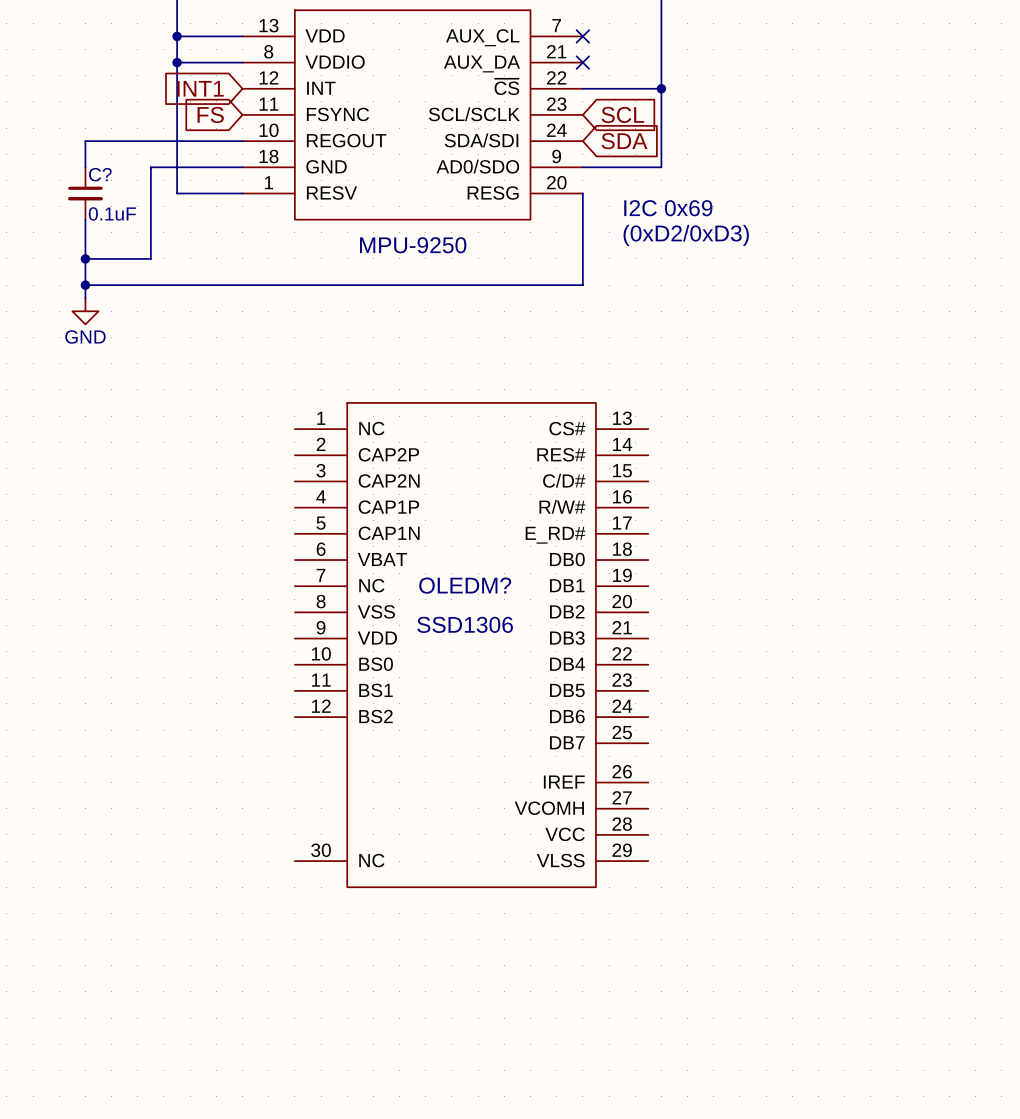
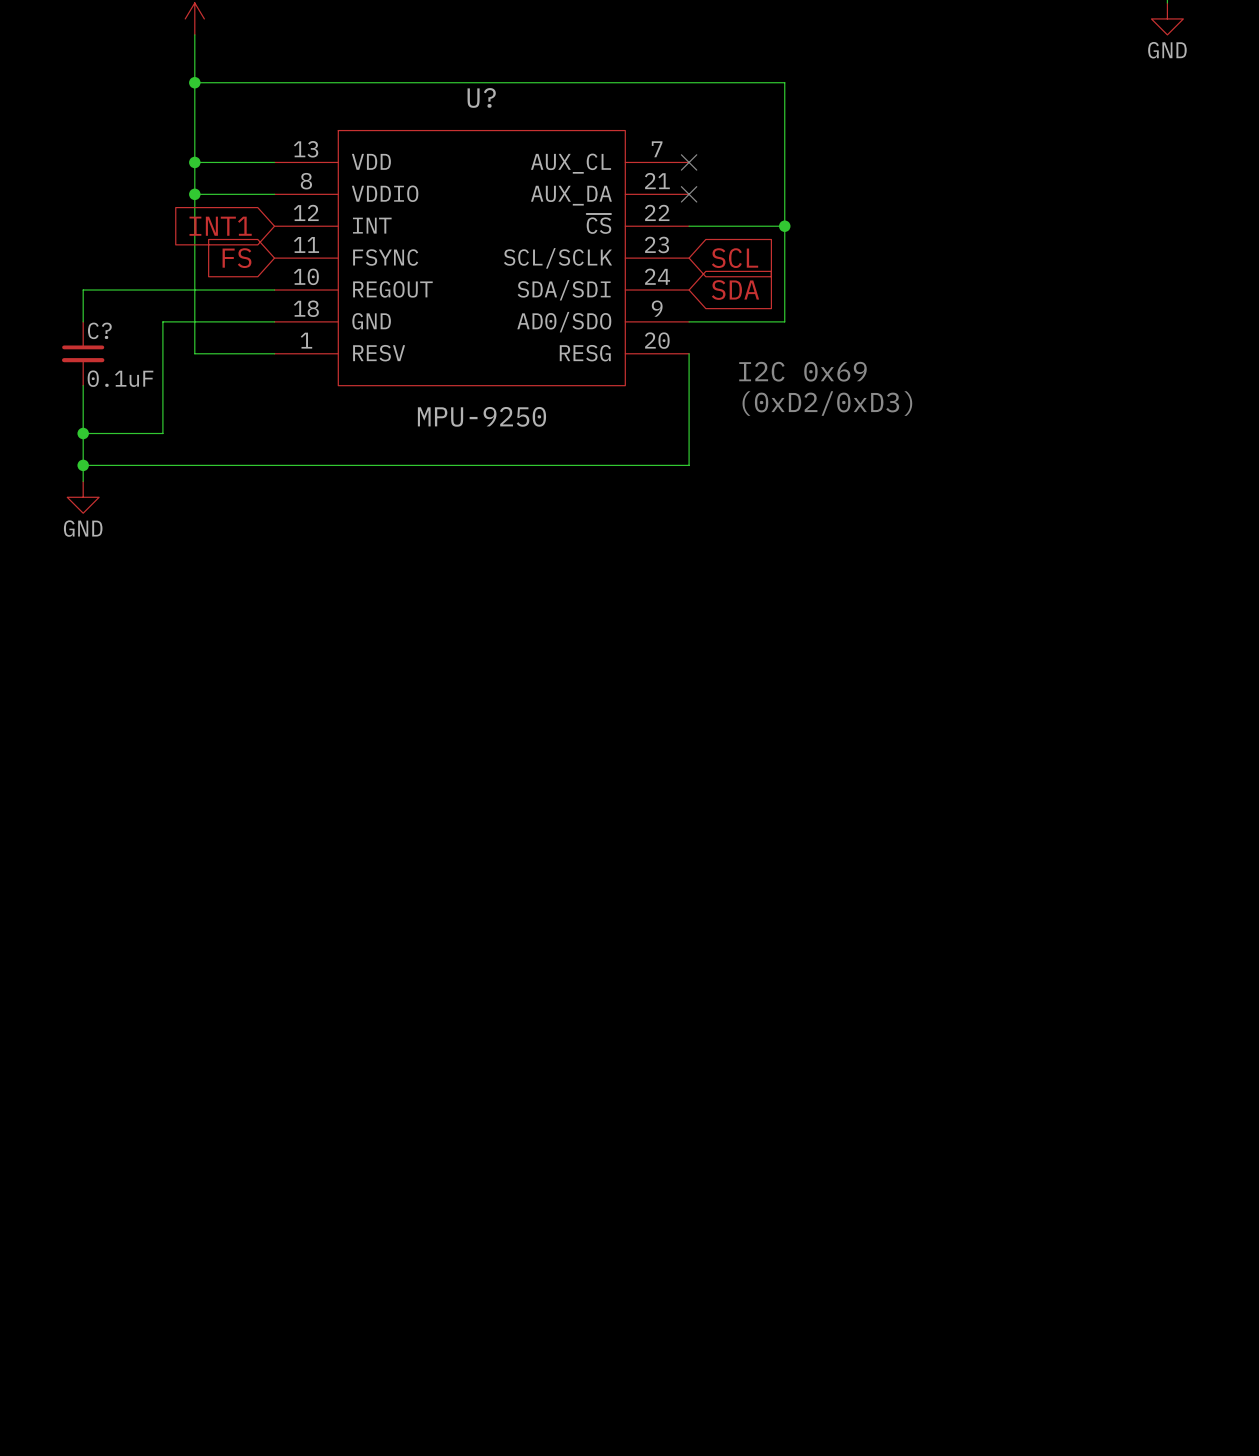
OLEDM?: SSD1306 (471, 645) -> none

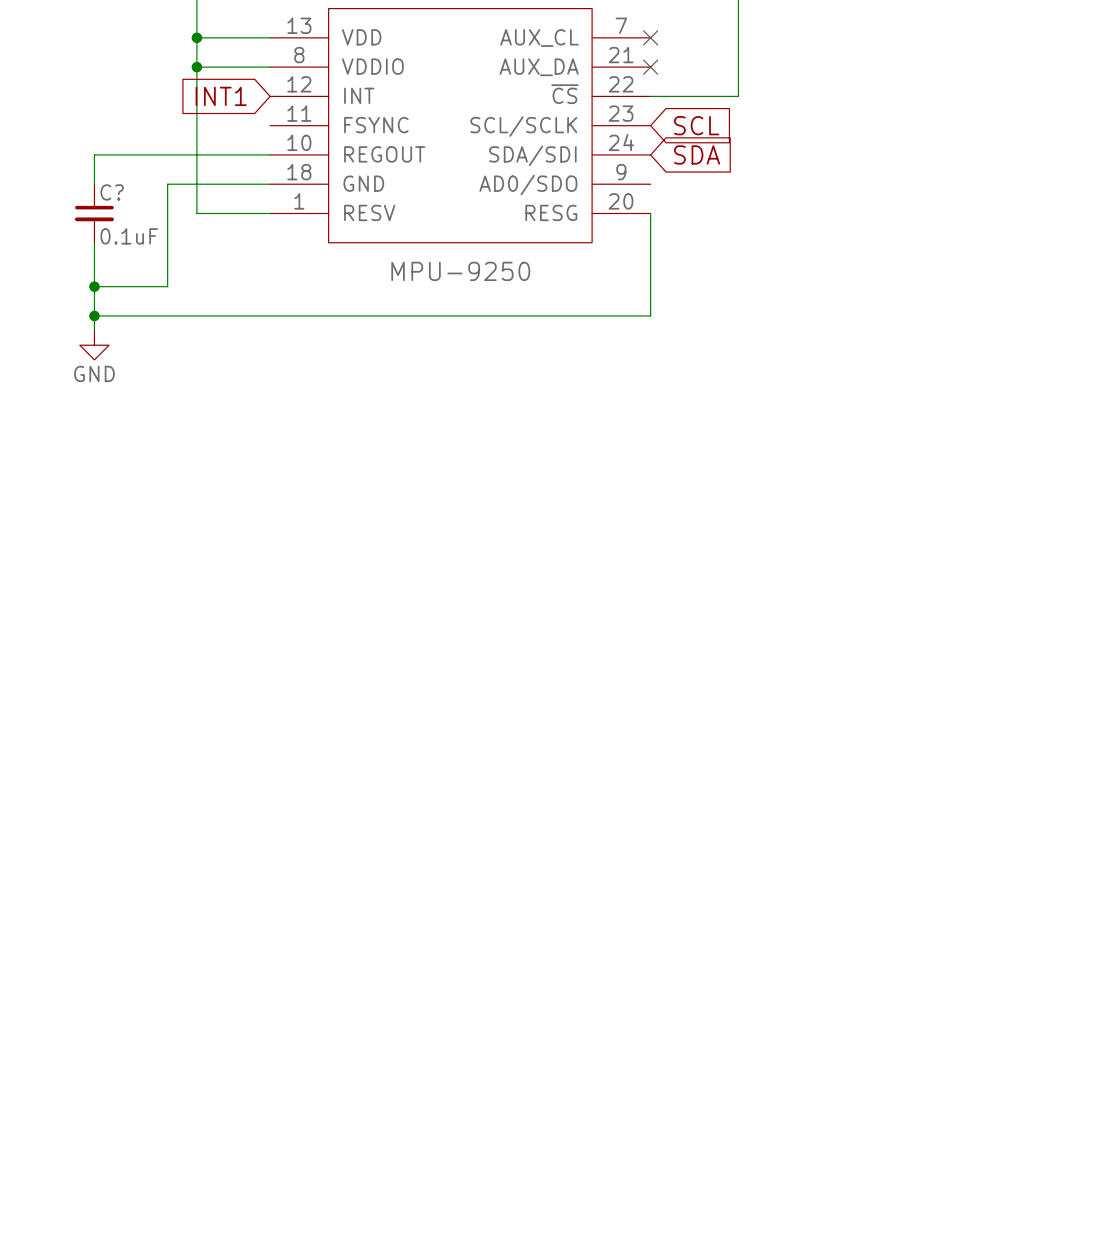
wire: (784, 226) (784, 321) (689, 321) -> none
junction: (784, 226) -> none
global label: FS (236, 258) -> none
text: I2C 0x69 (802, 371) -> none
text: (0xD2/0xD3) (827, 403) -> none

